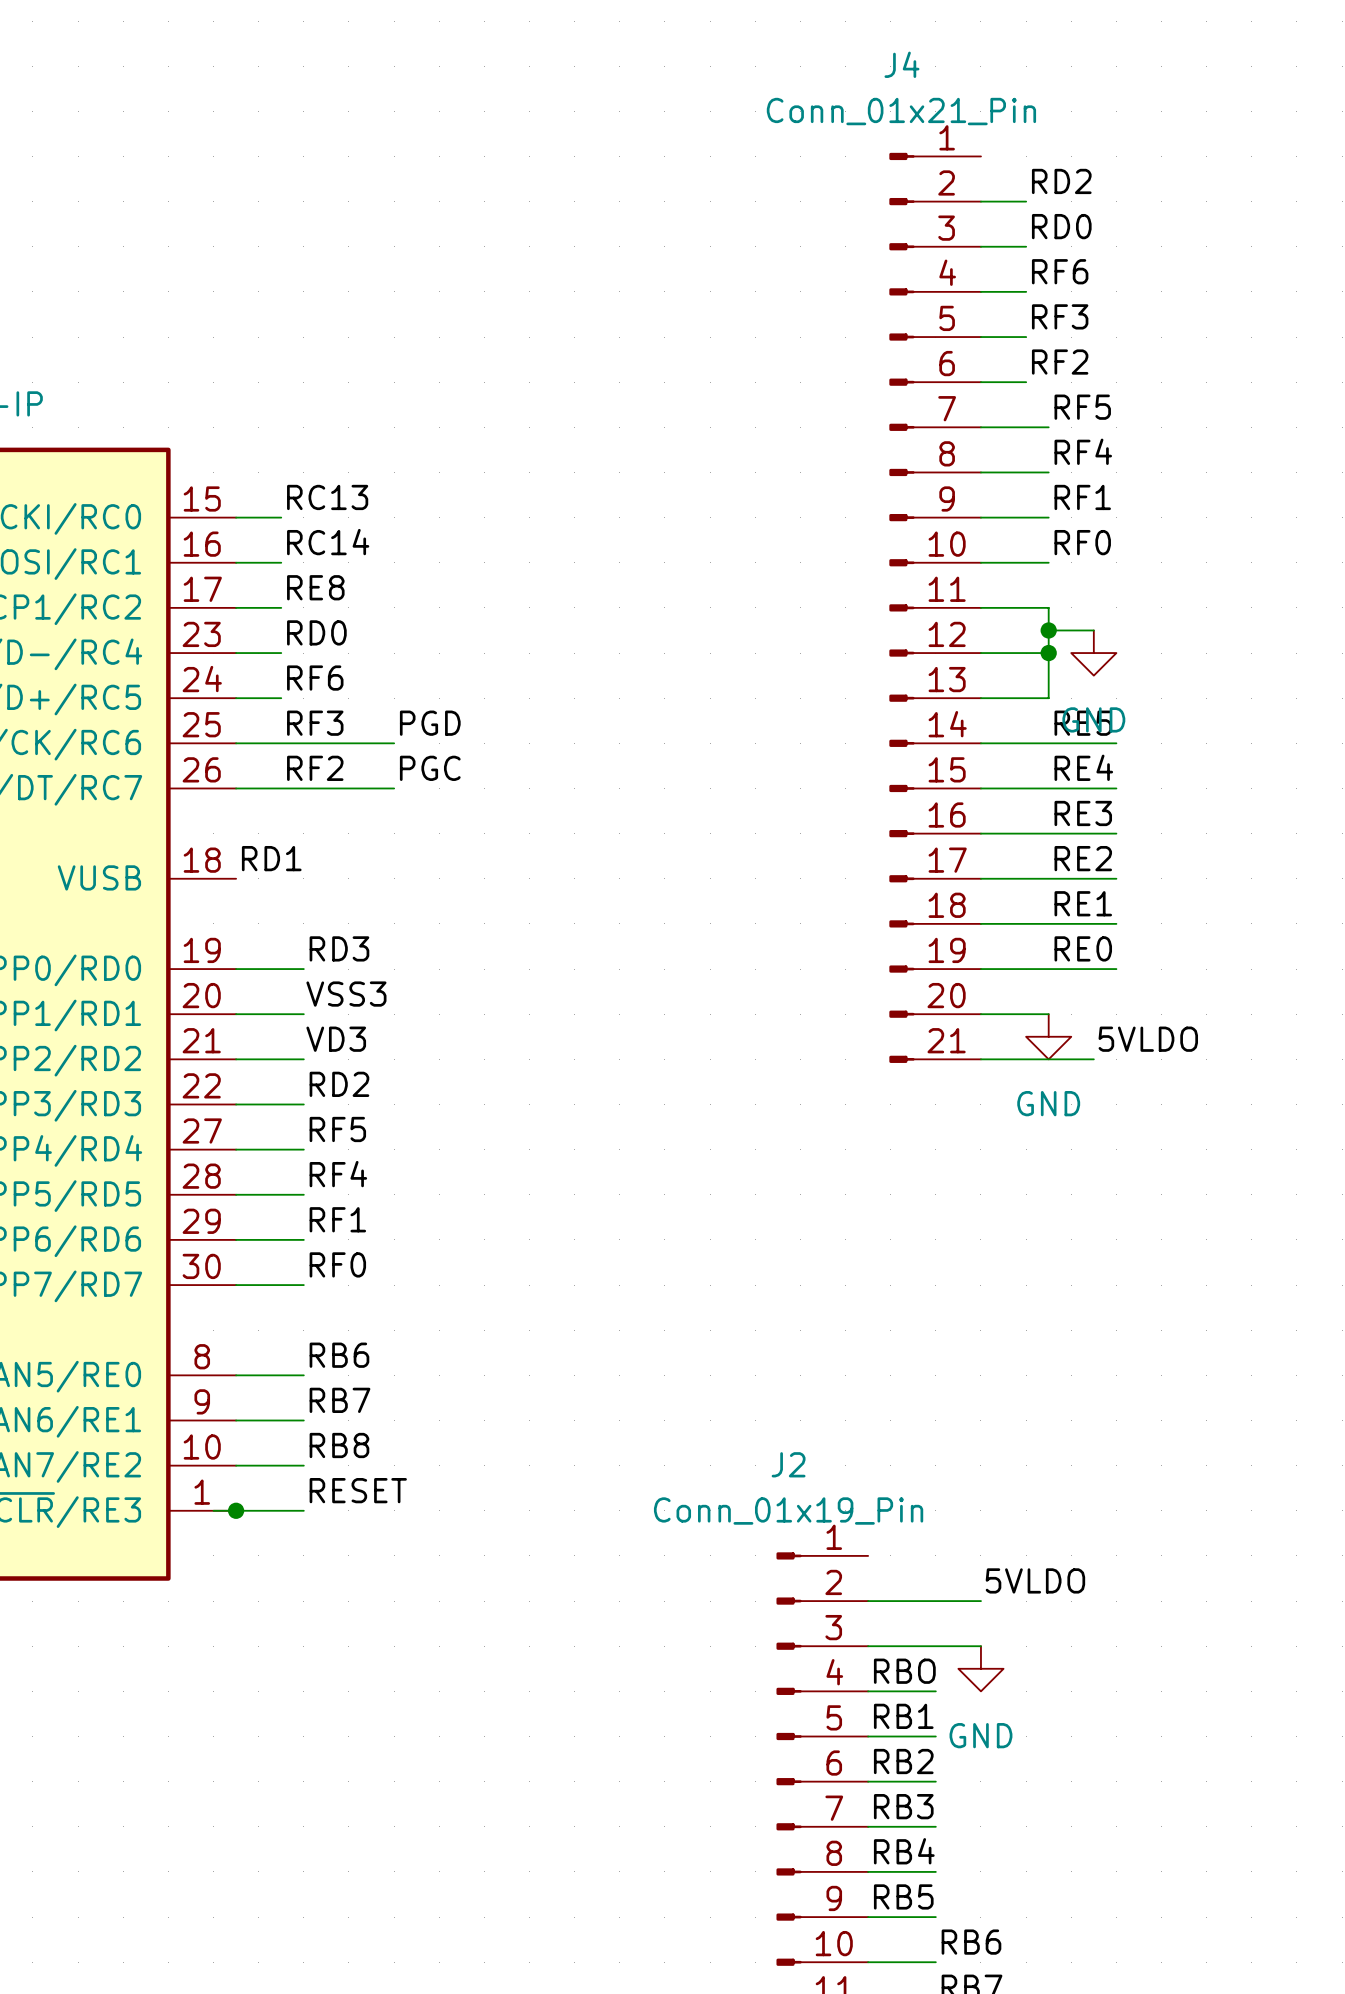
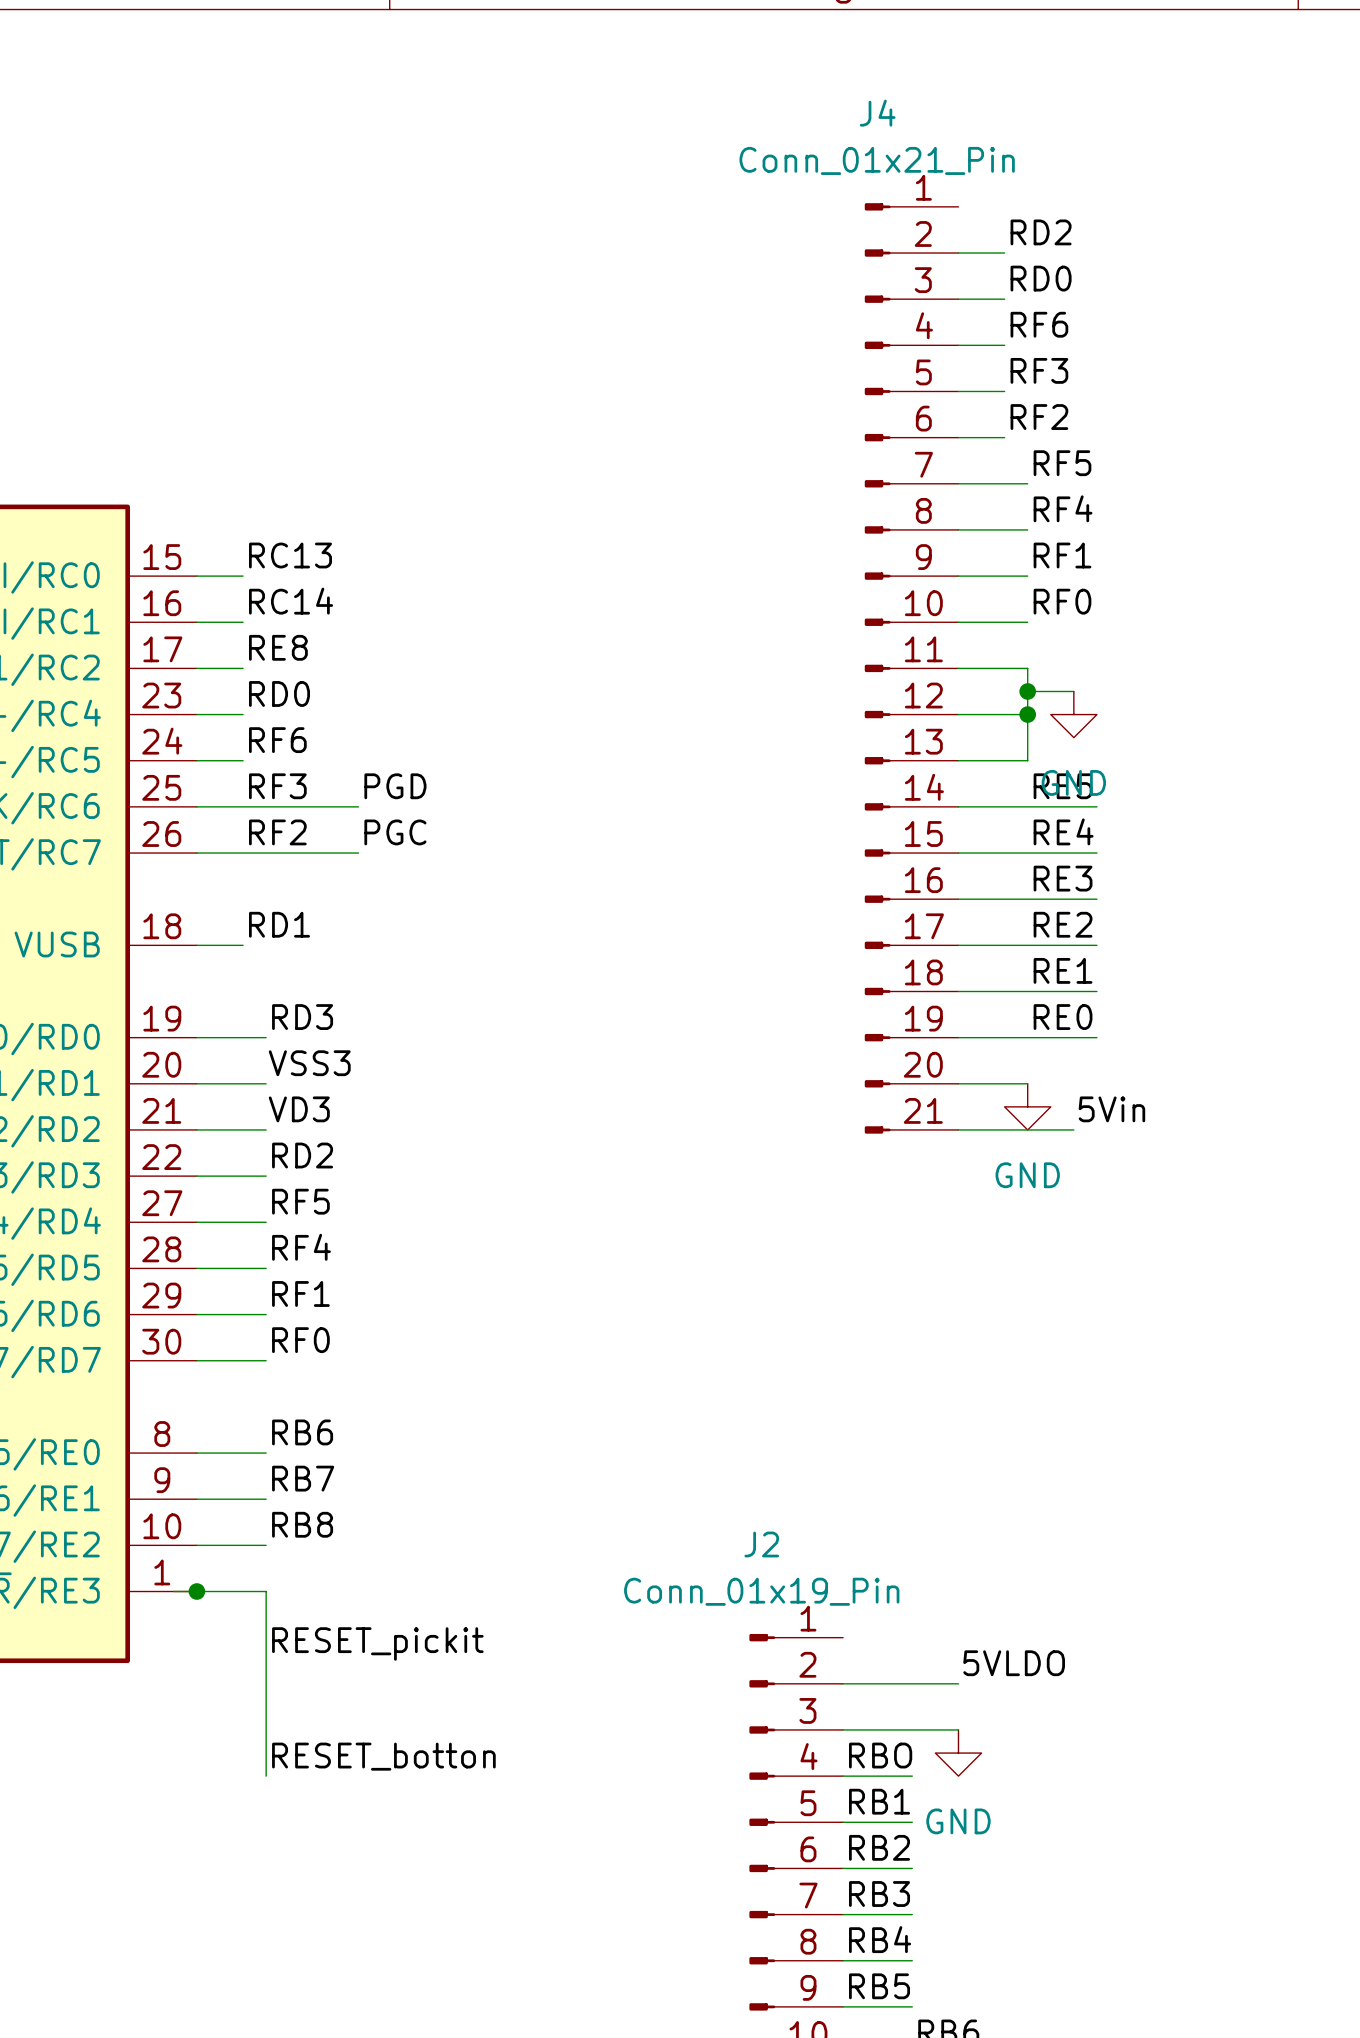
label position: RD1 (271, 858) -> RD1 (279, 924)
wire: none -> (196, 945) (243, 945)
label: 5VLDO (1148, 1039) -> 5Vin (1111, 1109)
label: RESET (358, 1490) -> none
wire: none -> (266, 1591) (266, 1776)
label: none -> RESET_pickit (377, 1643)
label: none -> RESET_botton (383, 1756)

